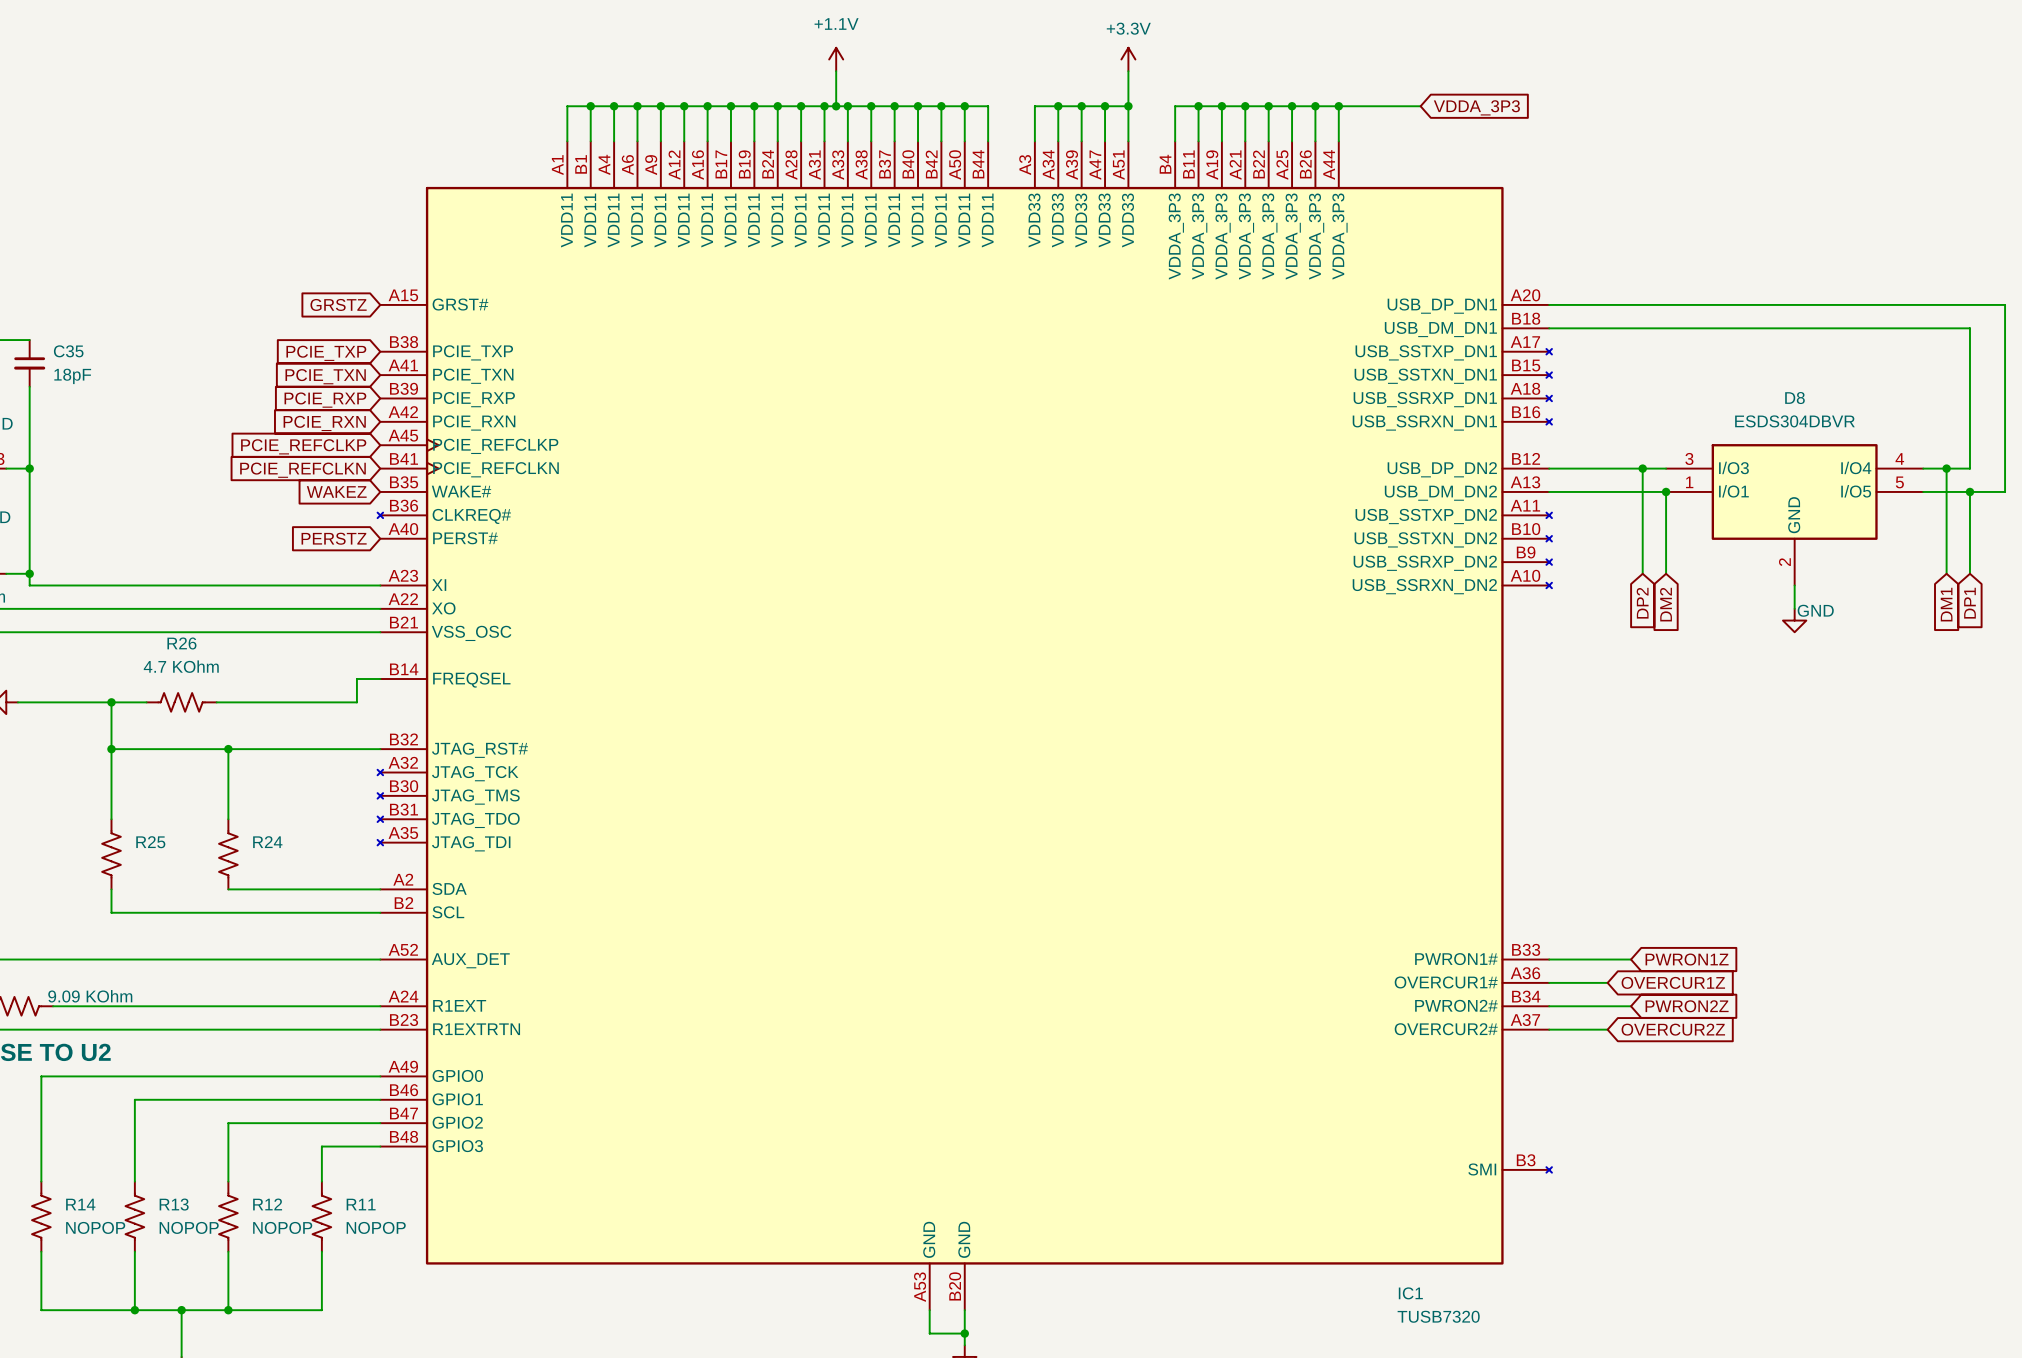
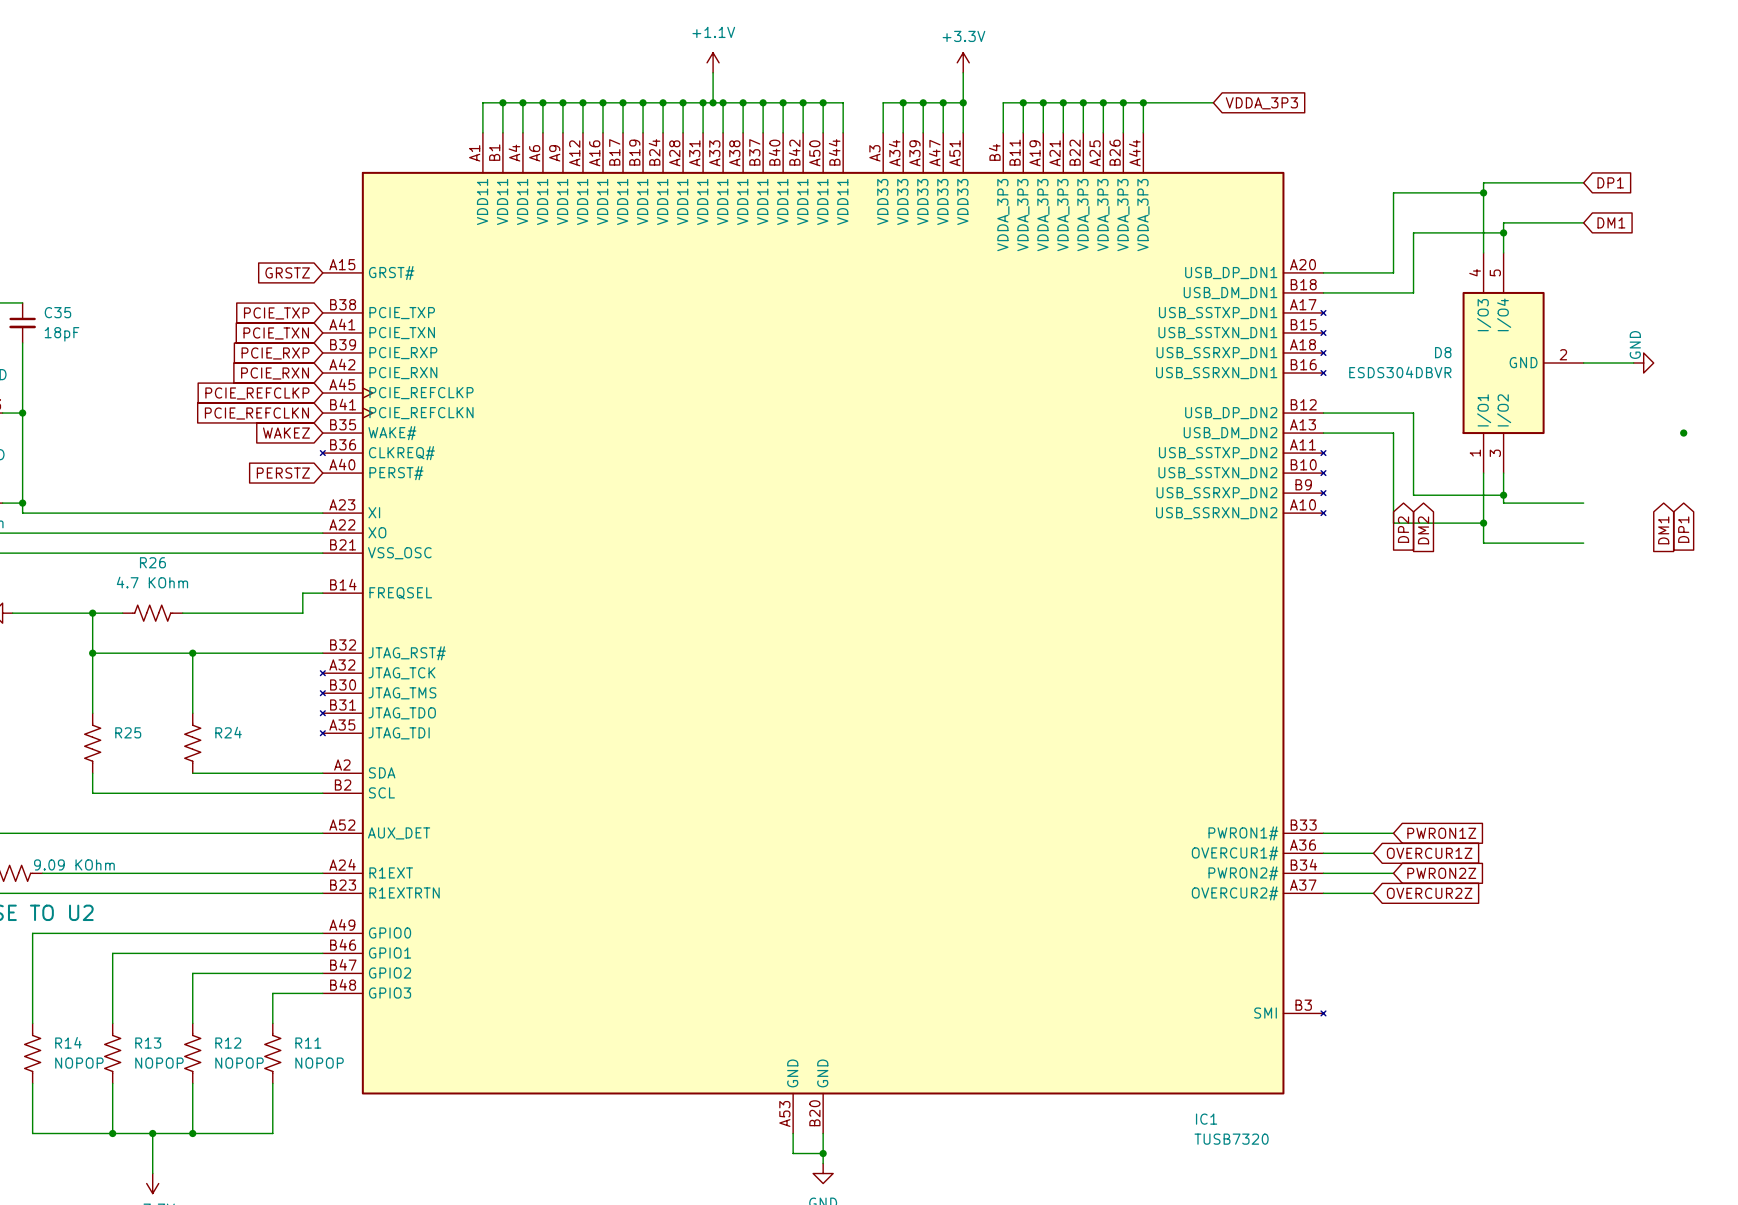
wire: none -> (1583, 182) (1483, 182) (1483, 252)
global label: none -> DP1 (1610, 182)
junction: none -> (1483, 192)
wire: none -> (1583, 222) (1503, 222) (1503, 252)
global label: none -> DM1 (1611, 222)
junction: none -> (1503, 232)
wire: (1631, 304) (2005, 304) (2005, 491) (1923, 491) -> (1393, 272) (1393, 192) (1483, 192)
wire: (1654, 328) (1969, 328) (1969, 468) (1923, 468) -> (1413, 292) (1413, 232) (1503, 232)
D8 name position: D8 (1794, 398) -> D8 (1443, 352)
wire: none -> (1583, 363) (1633, 363)
power symbol: none -> GND (1643, 363)
D8 value position: ESDS304DBVR (1794, 421) -> ESDS304DBVR (1400, 372)
D8 symbol: [1666, 444, 1924, 586] -> [1462, 252, 1584, 474]
wire: (1642, 468) (1642, 573) -> none
junction: (1642, 468) -> none
wire: (1654, 468) (1666, 468) -> (1413, 413) (1413, 495) (1503, 495)
wire: (1946, 468) (1946, 573) -> none
junction: (1946, 468) -> none
wire: (1631, 491) (1666, 491) (1666, 573) -> (1393, 433) (1393, 523) (1483, 523)
junction: (1666, 491) -> none
wire: (1969, 491) (1969, 573) -> none
wire: none -> (1483, 473) (1483, 543) (1583, 543)
wire: none -> (1503, 473) (1503, 503) (1583, 503)
junction: none -> (1503, 495)
wire: (1794, 585) (1794, 608) -> none
junction: none -> (1483, 523)
power symbol: GND (1794, 620) -> none

